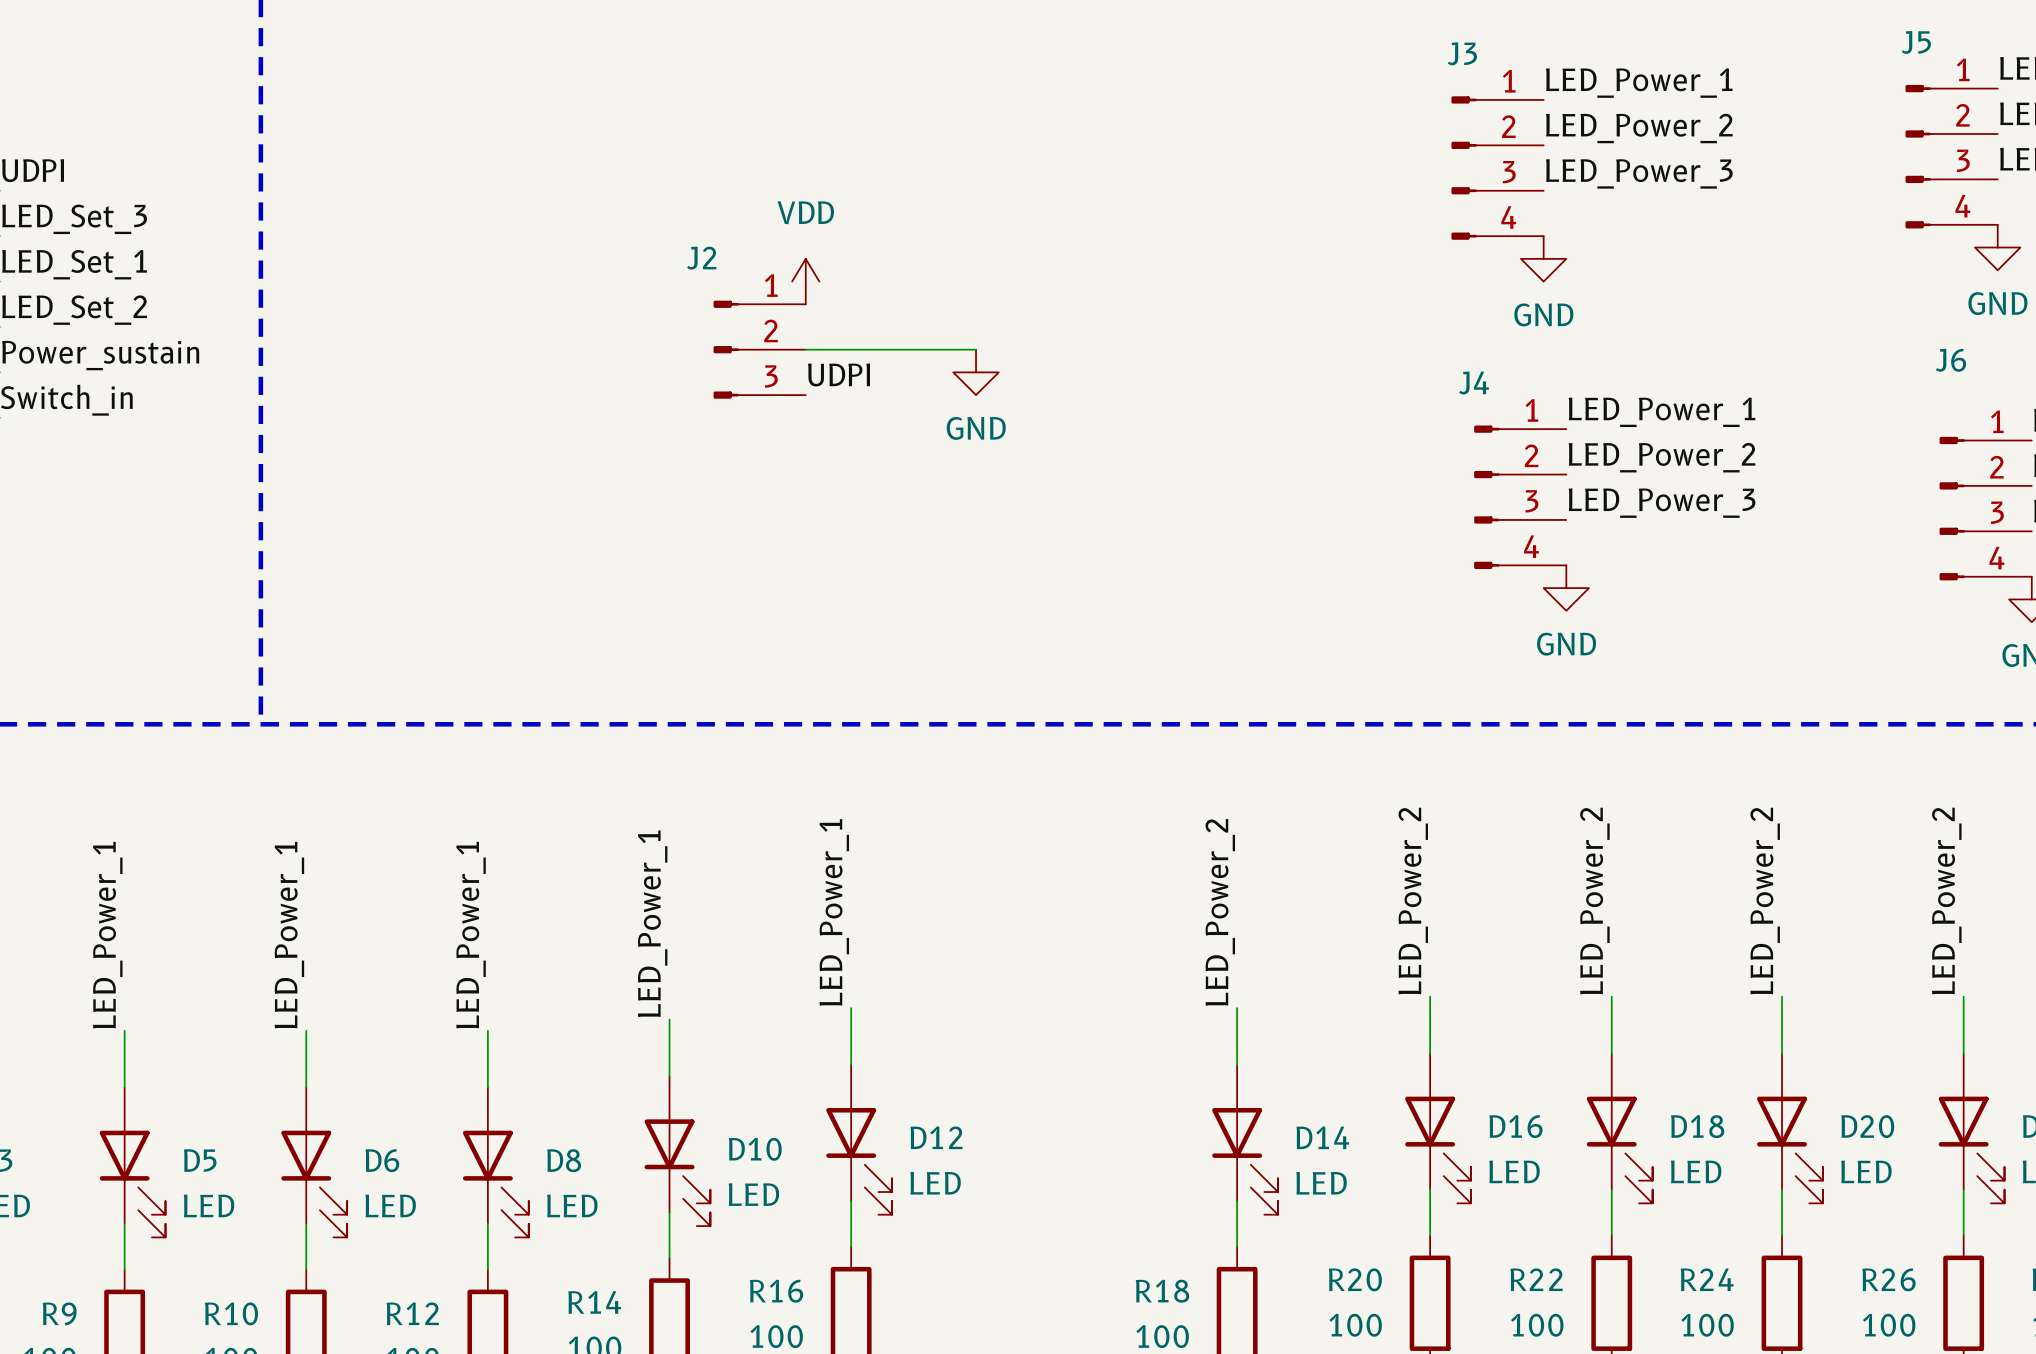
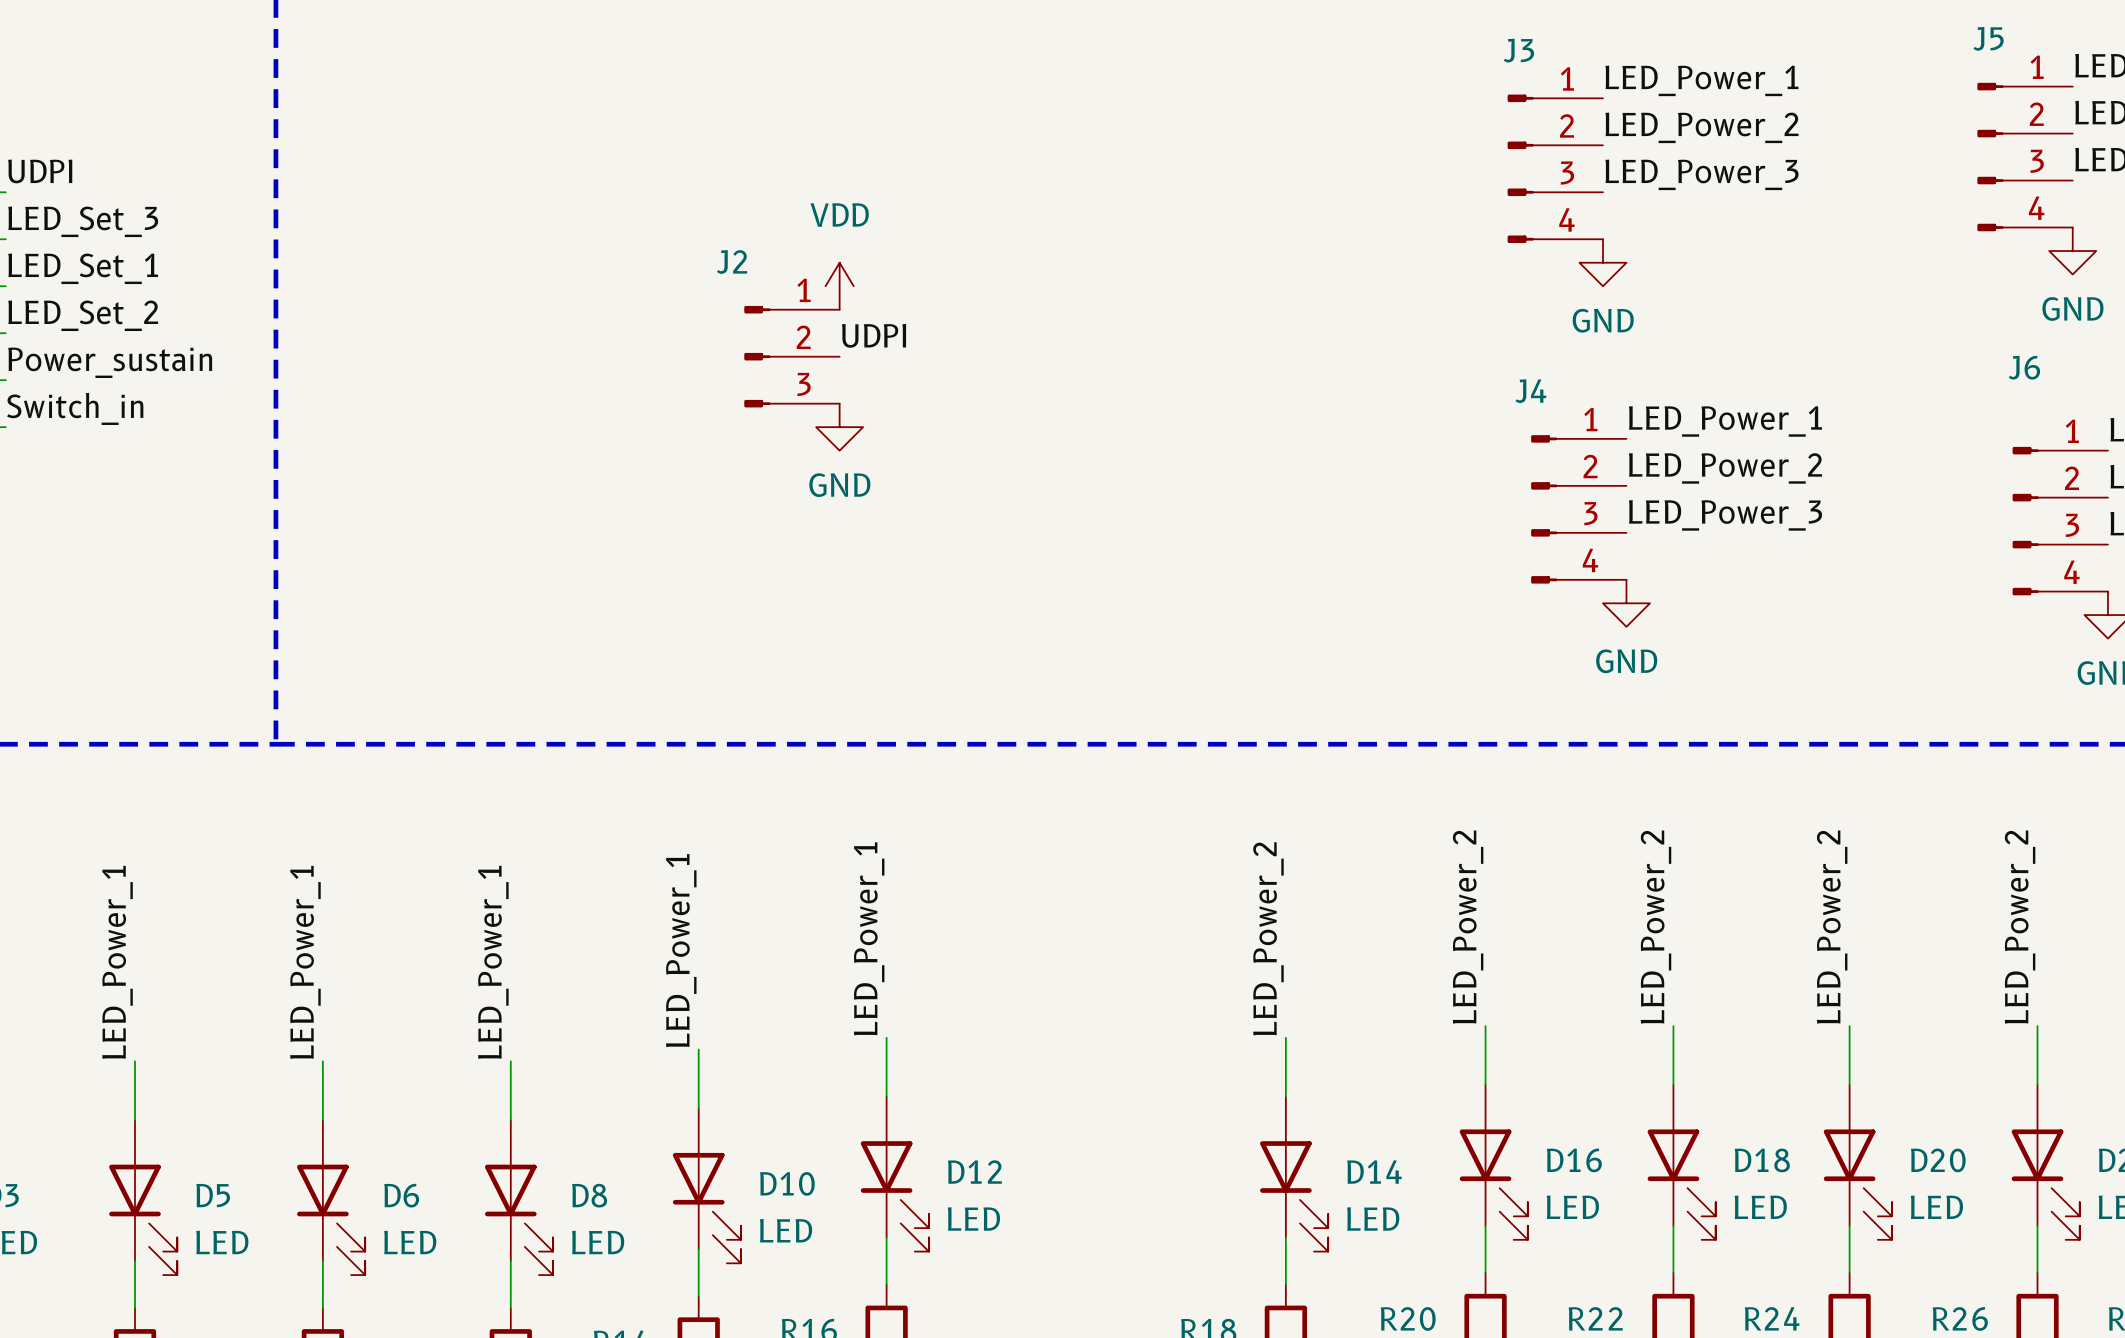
wire: (805, 349) (976, 349) -> none
power symbol position: GND (976, 372) -> GND (839, 427)
label position: UDPI (838, 374) -> UDPI (874, 335)

